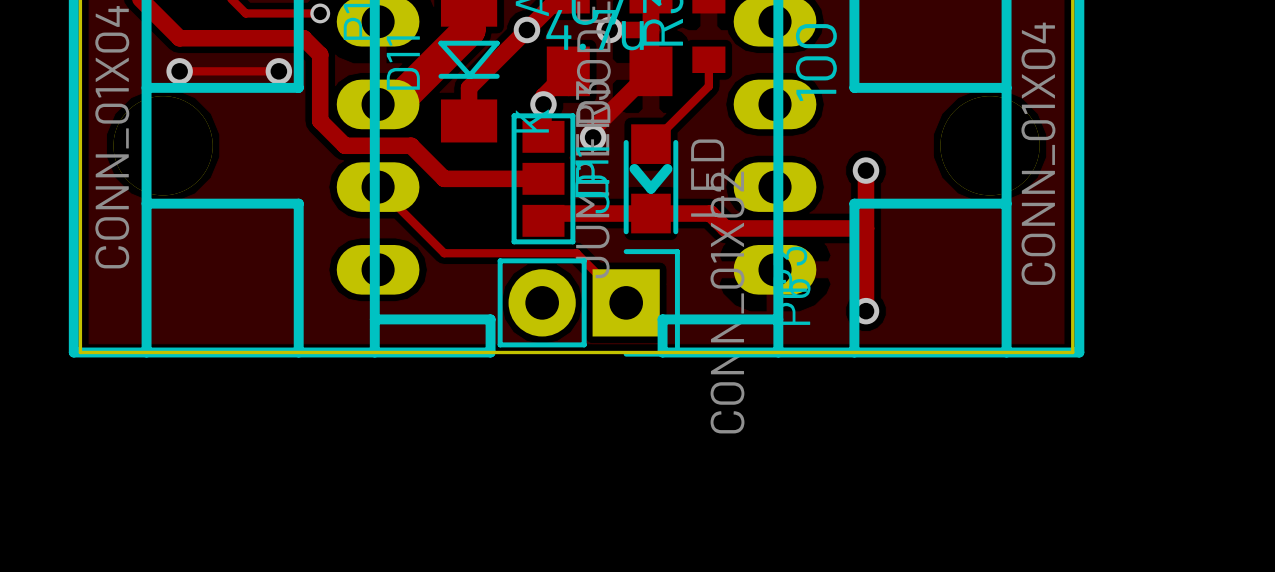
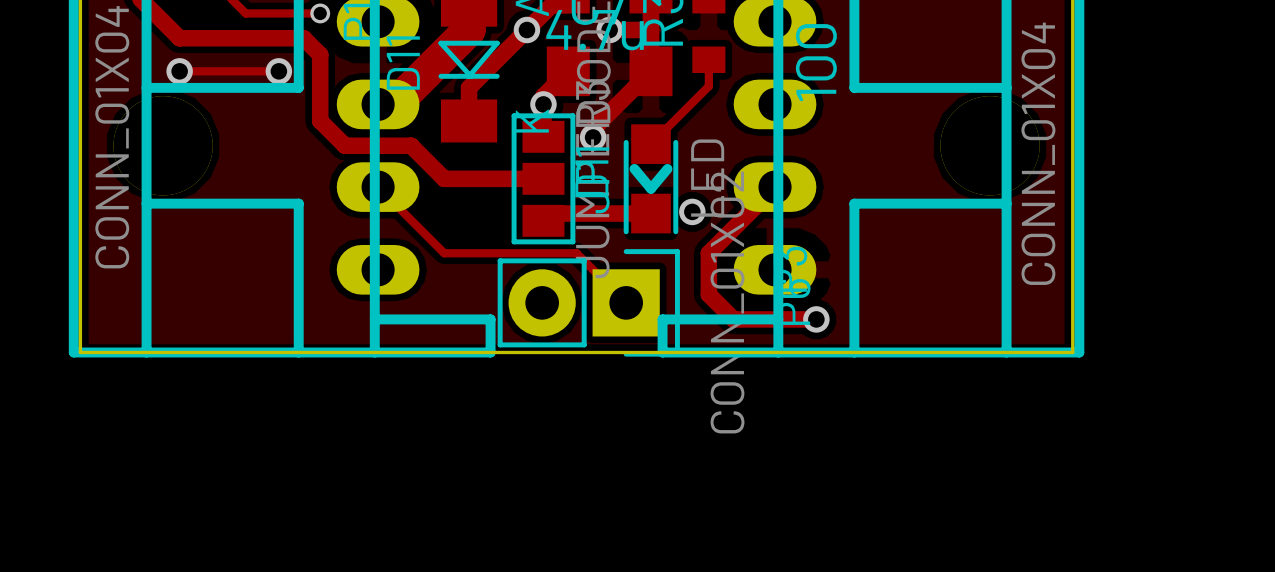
track: (865, 170) (865, 311) -> none
via: (865, 170) -> none
track: none -> (775, 187) (708, 253) (708, 294) (733, 319) (816, 319)
via: none -> (692, 211)
track: (650, 213) (710, 213) (725, 228) (865, 228) -> none
via position: (865, 311) -> (816, 319)

